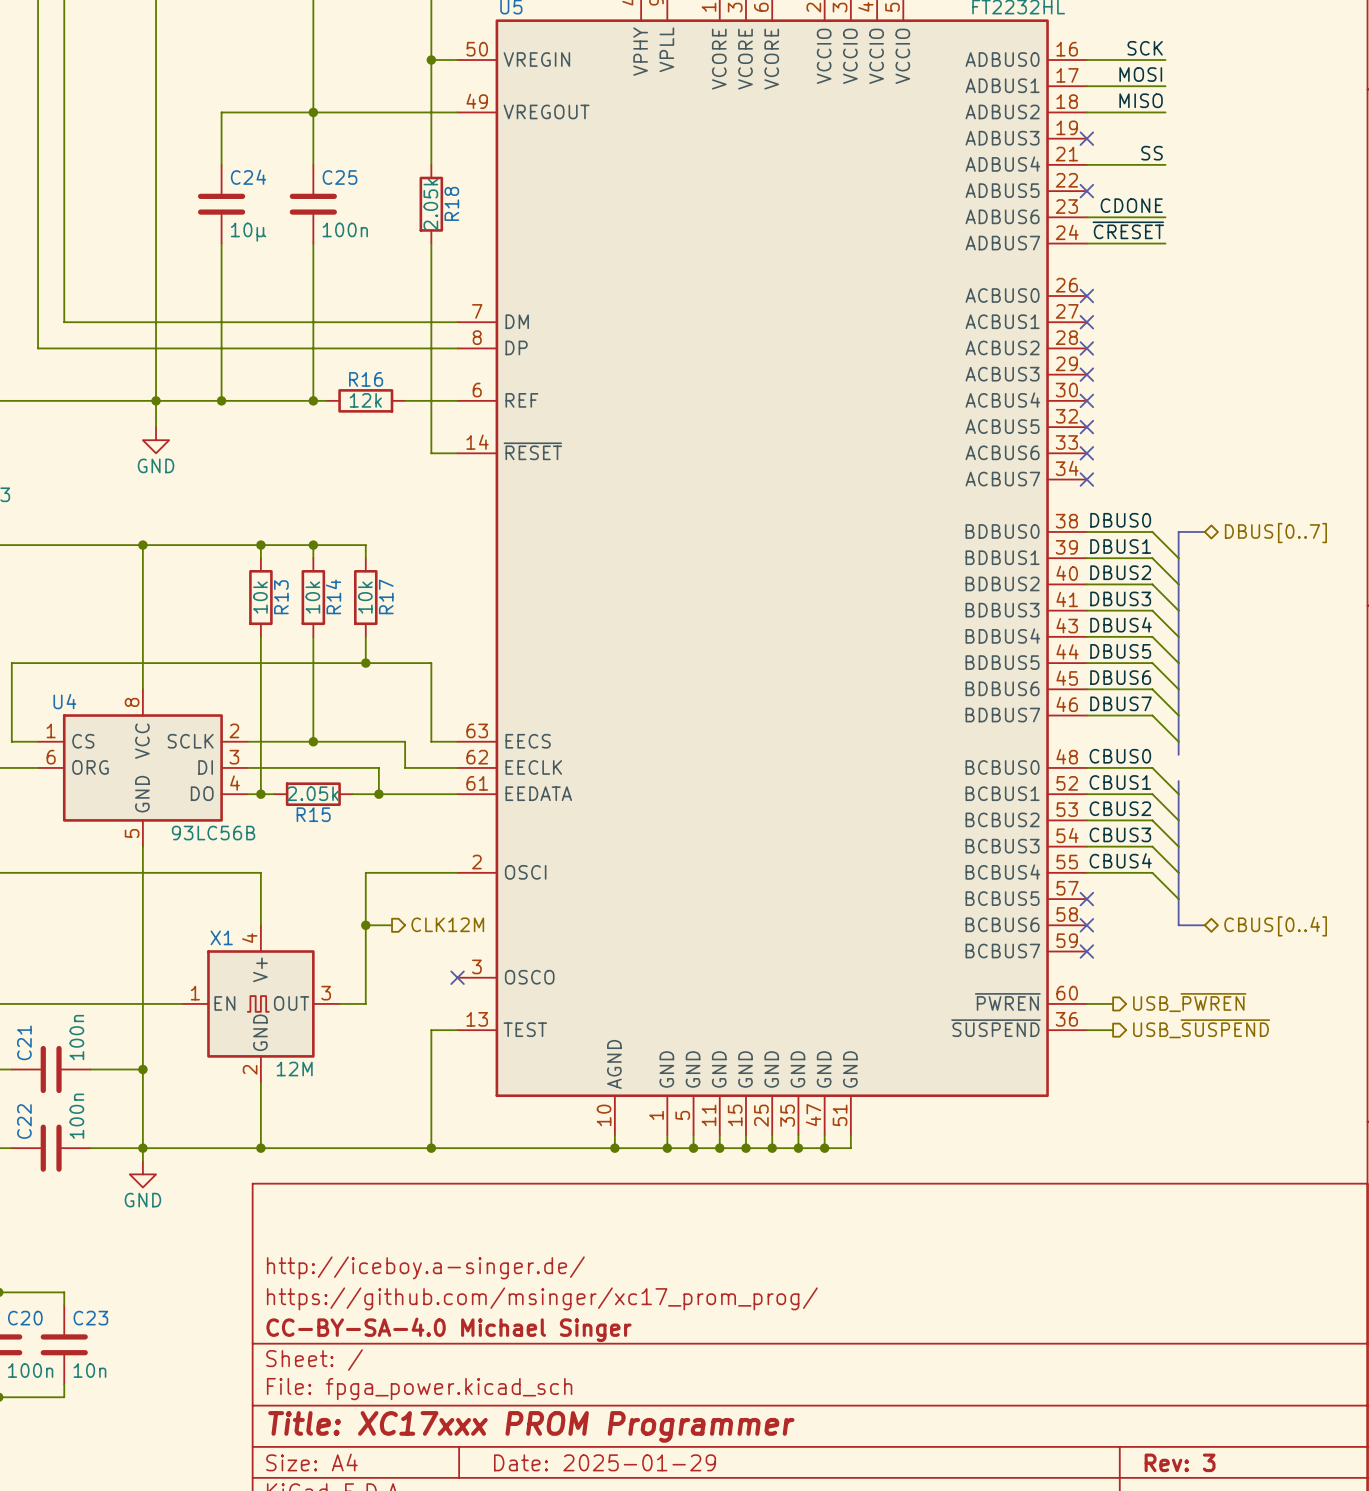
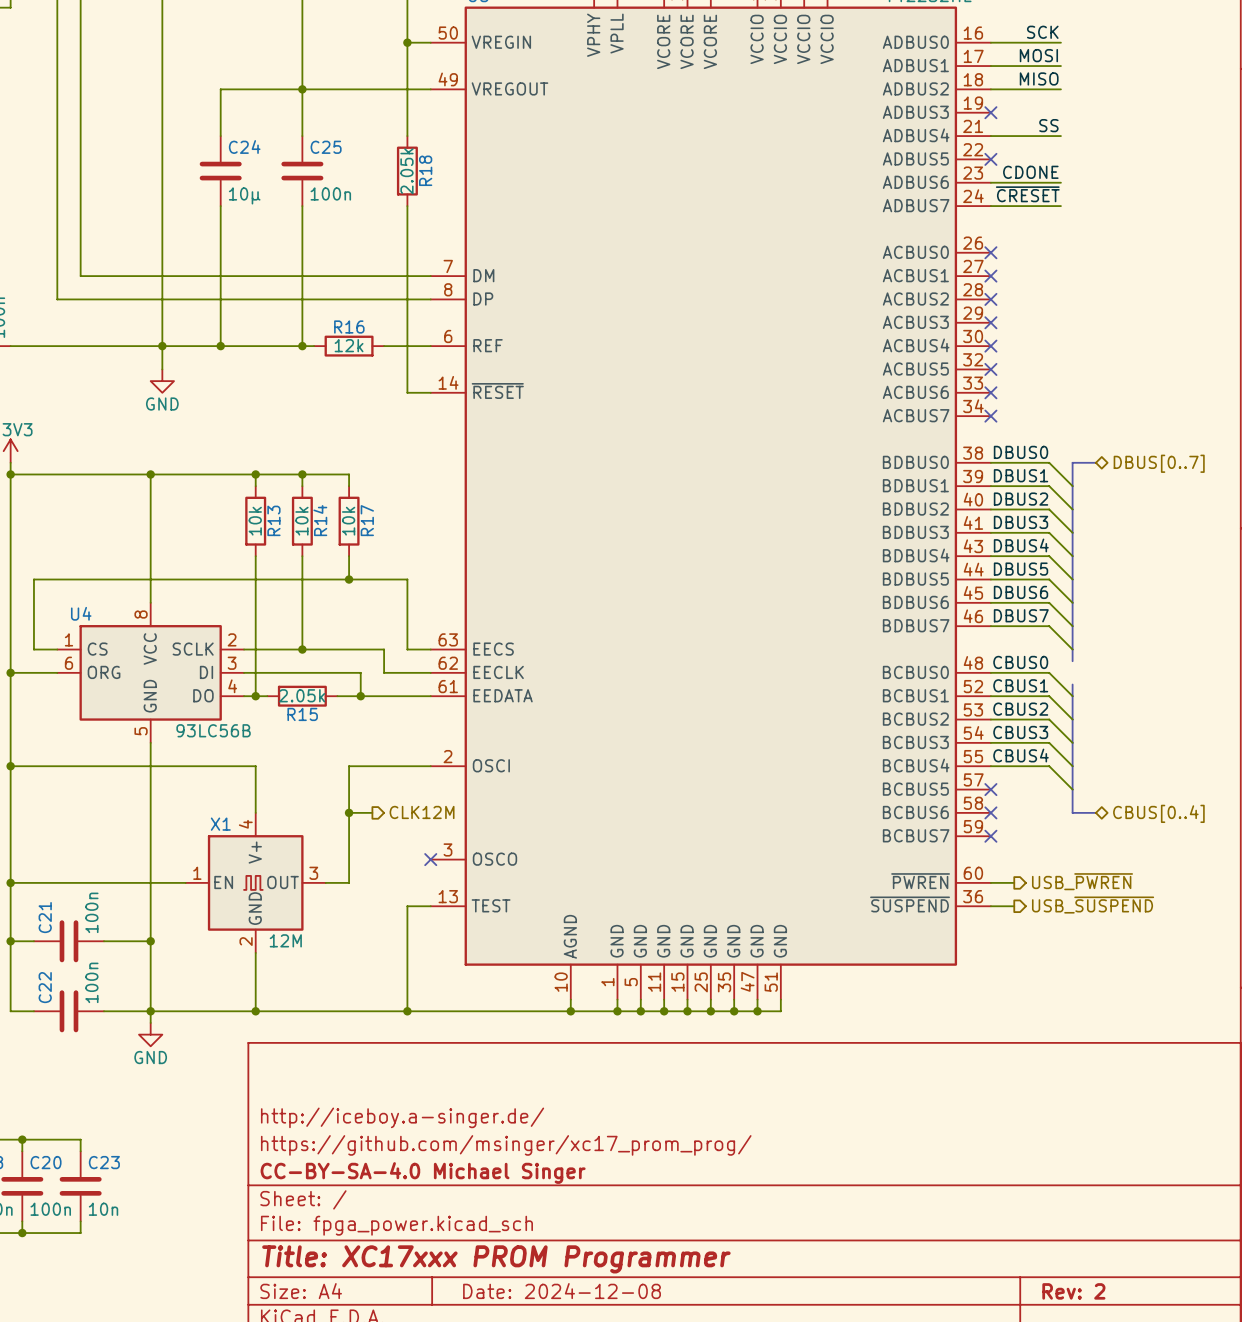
title block: Date: 2025-01-29 (605, 1462) -> Date: 2024-12-08 (562, 1291)
title block: Rev: 3 (1180, 1462) -> Rev: 2 (1073, 1291)

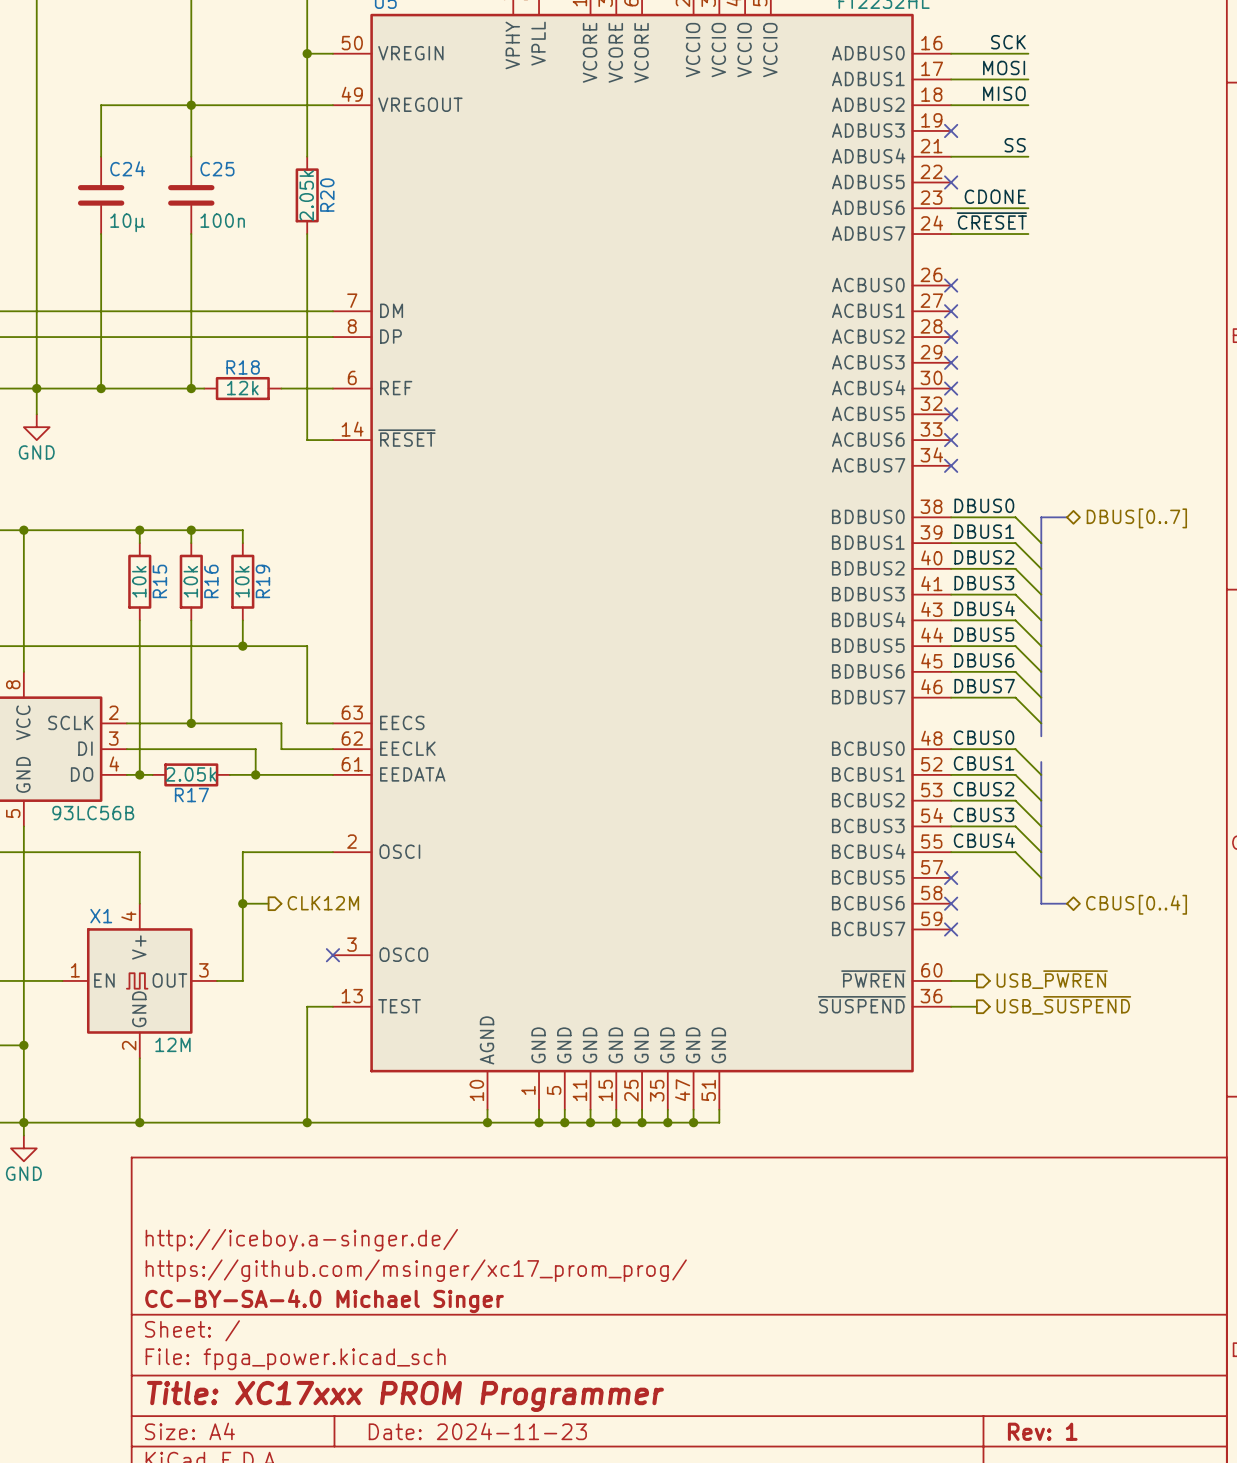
R18 name: R18 (425, 170) -> R20 (327, 195)
R16 name: R16 (349, 327) -> R18 (243, 367)
R13 name: R13 (273, 520) -> R15 (159, 581)
R14 name: R14 (320, 520) -> R16 (211, 581)
R17 name: R17 (367, 520) -> R19 (262, 581)
R15 name: R15 (302, 714) -> R17 (191, 795)
title block: Date: 2024-12-08 (562, 1291) -> Date: 2024-11-23 (477, 1431)
title block: Rev: 2 (1073, 1291) -> Rev: 1 (1042, 1431)

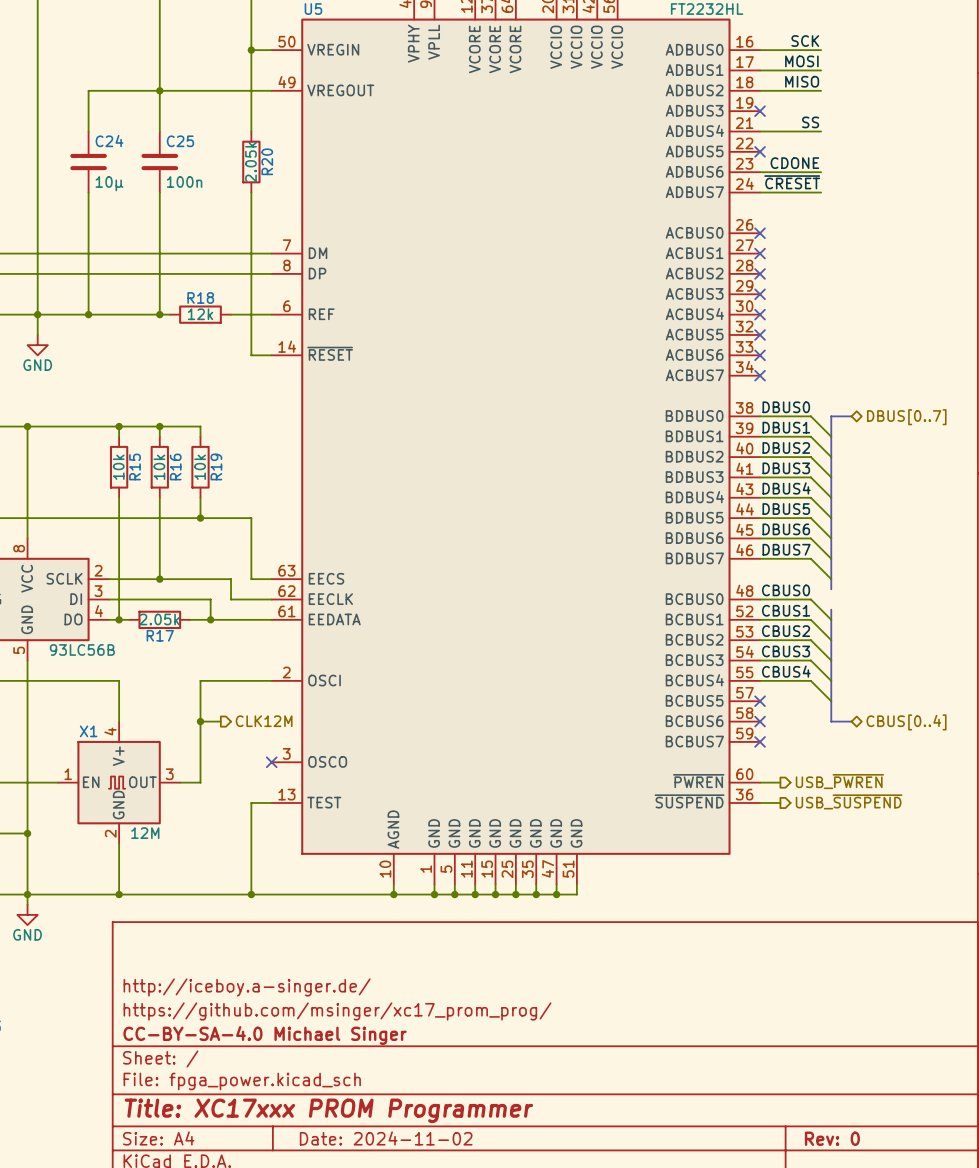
title block: Date: 2024-11-23 (477, 1431) -> Date: 2024-11-02 (386, 1138)
title block: Rev: 1 (1042, 1431) -> Rev: 0 (832, 1138)

